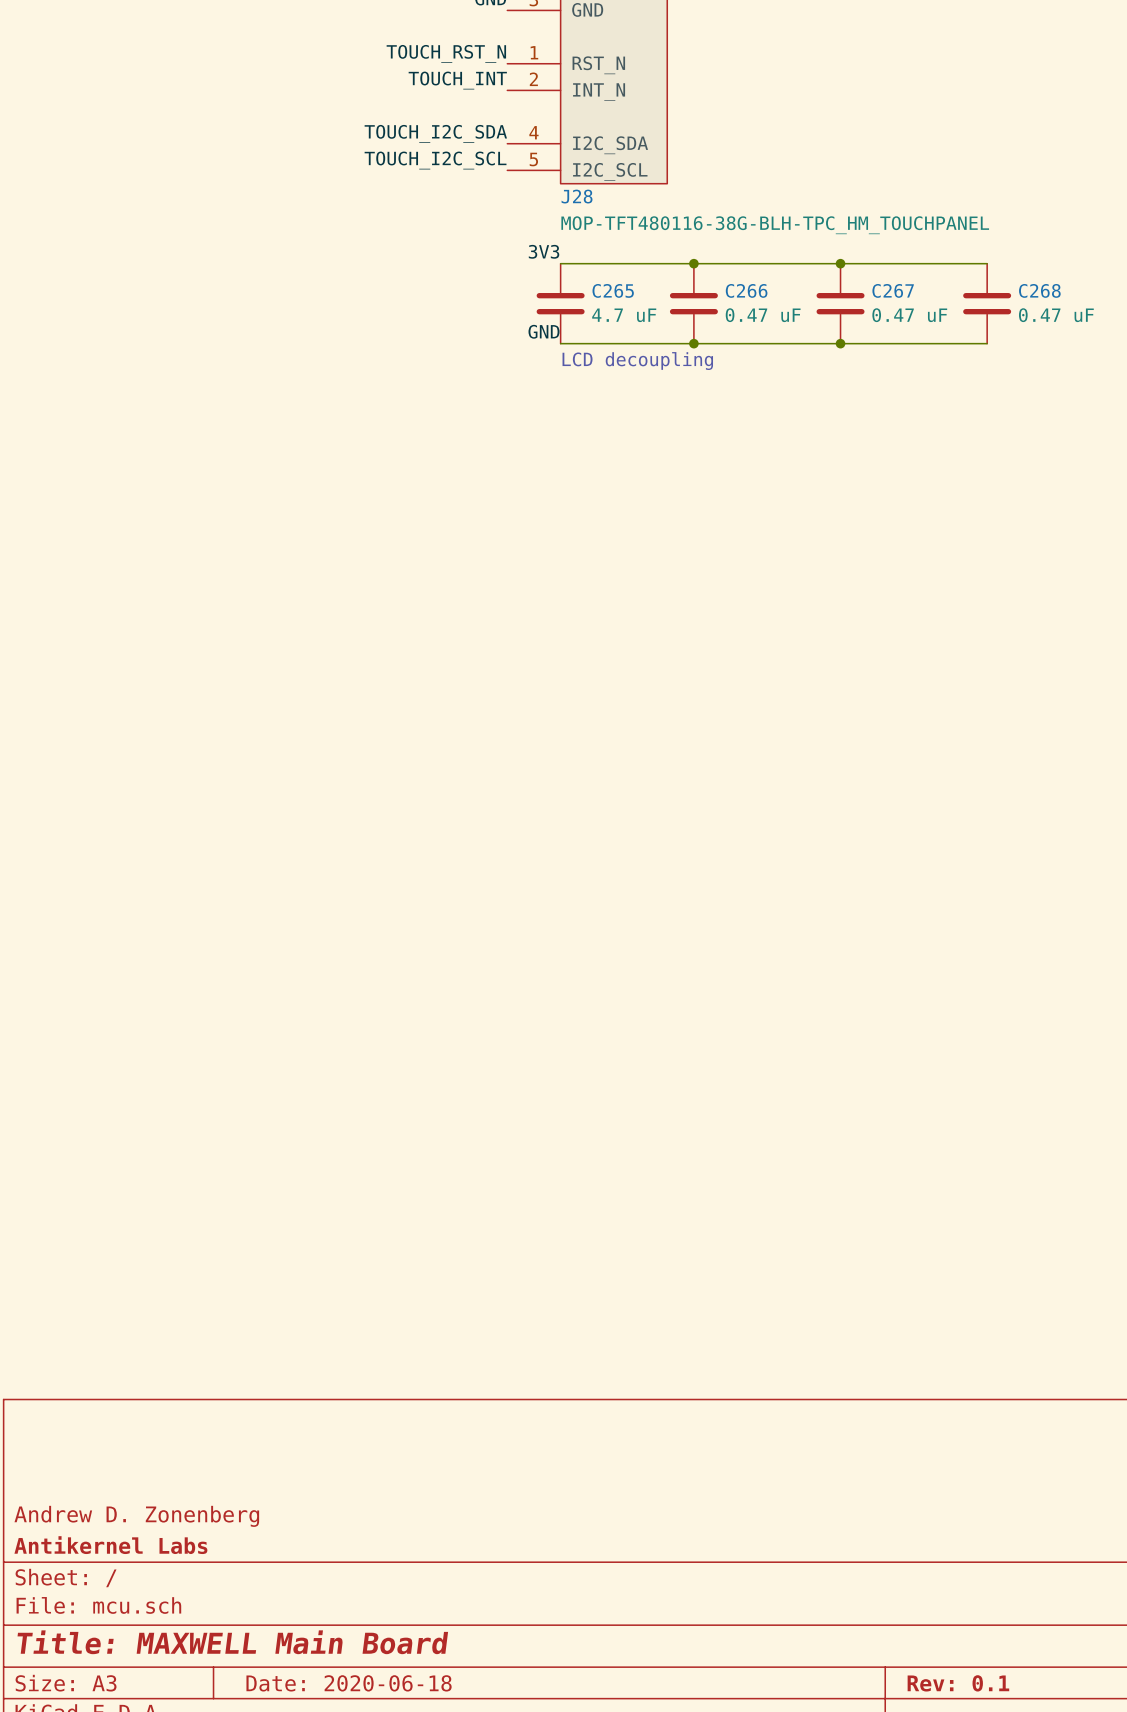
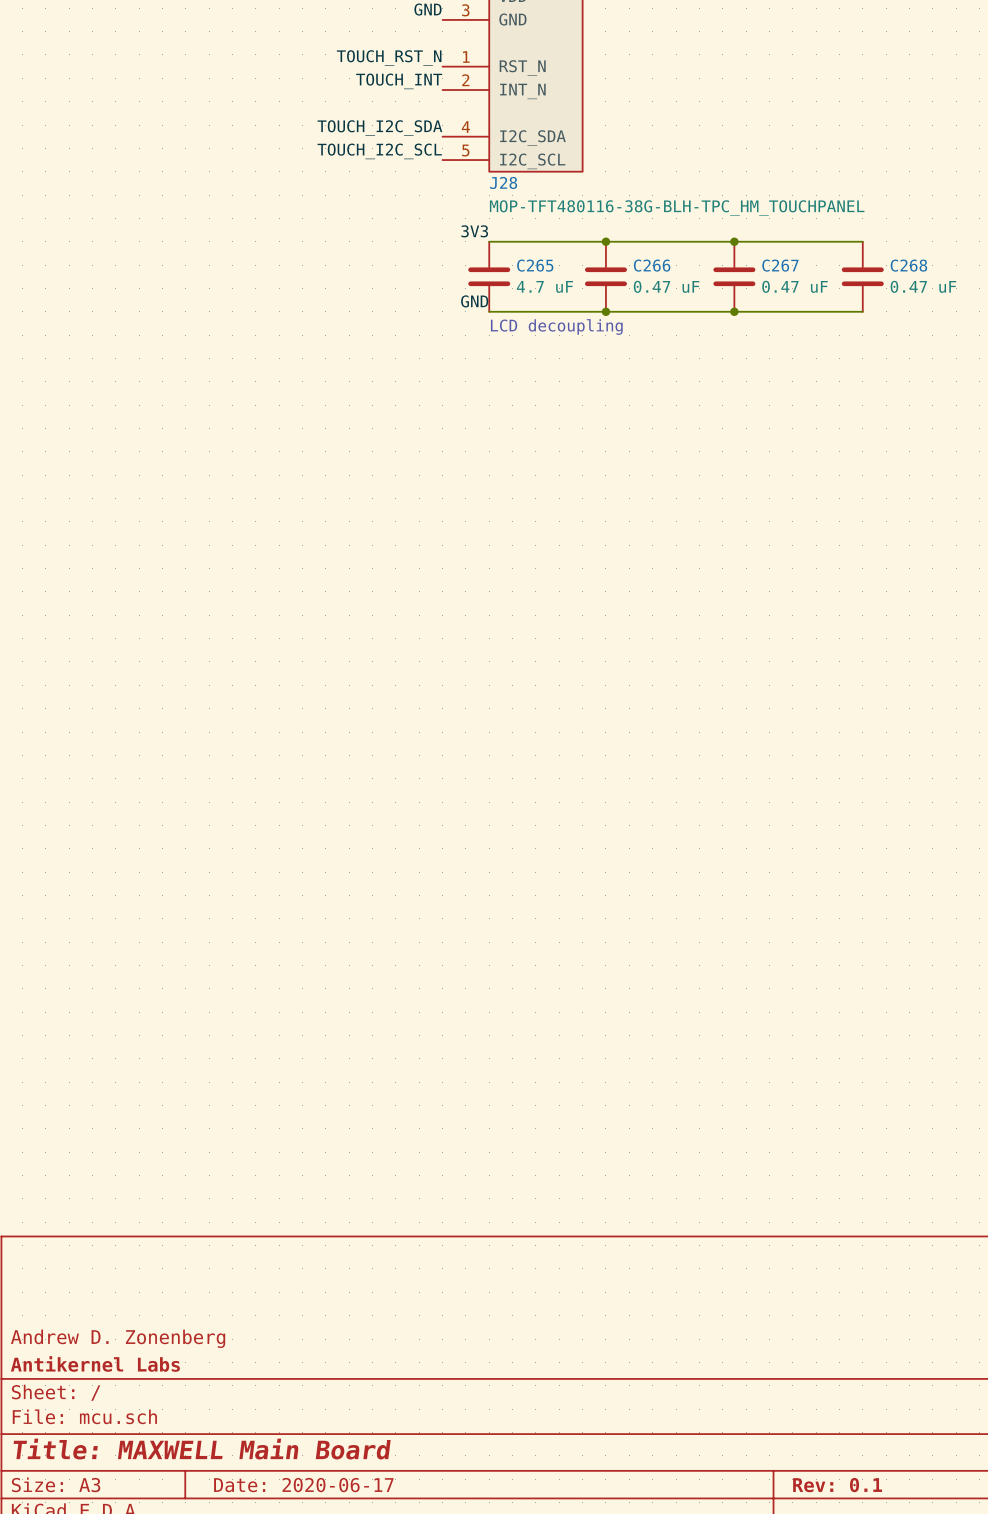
title block: Date: 2020-06-18 (349, 1683) -> Date: 2020-06-17 (303, 1485)

